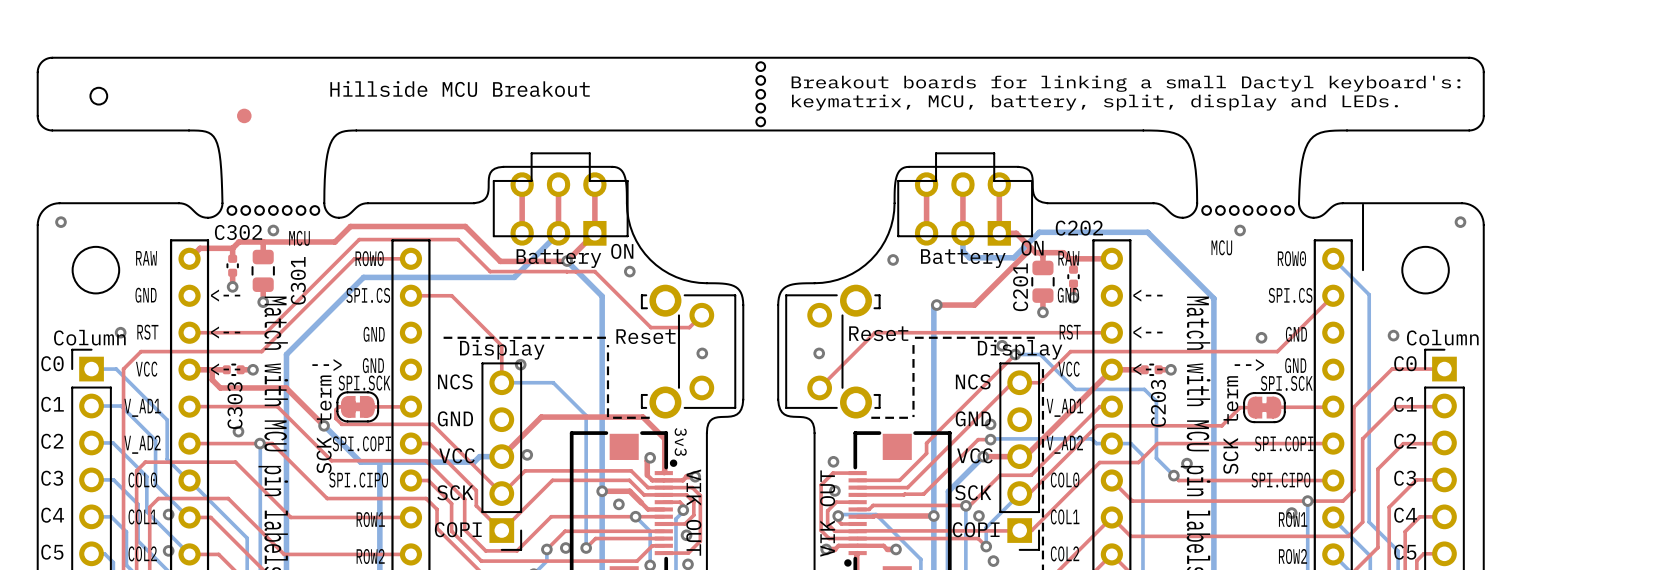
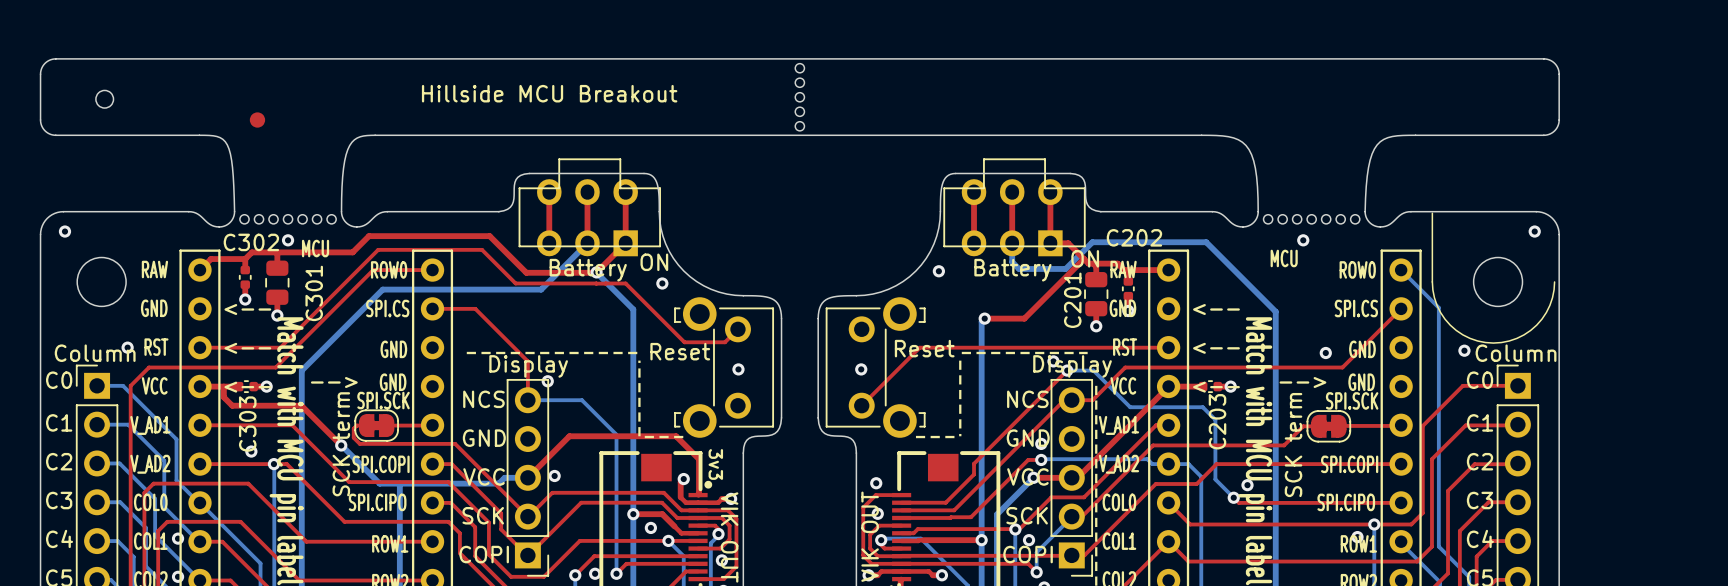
text: Breakout boards for linking a small Dactyl keyboard's: (1126, 83) -> none
text position: Hillside MCU Breakout (460, 89) -> Hillside MCU Breakout (549, 93)
text: keymatrix, MCU, battery, split, display and LEDs. (1094, 102) -> none
line: none -> (1432, 281) (1437, 305) (1450, 325) (1470, 338) (1493, 343) (1516, 338) (1536, 325) (1549, 305) (1554, 281)

